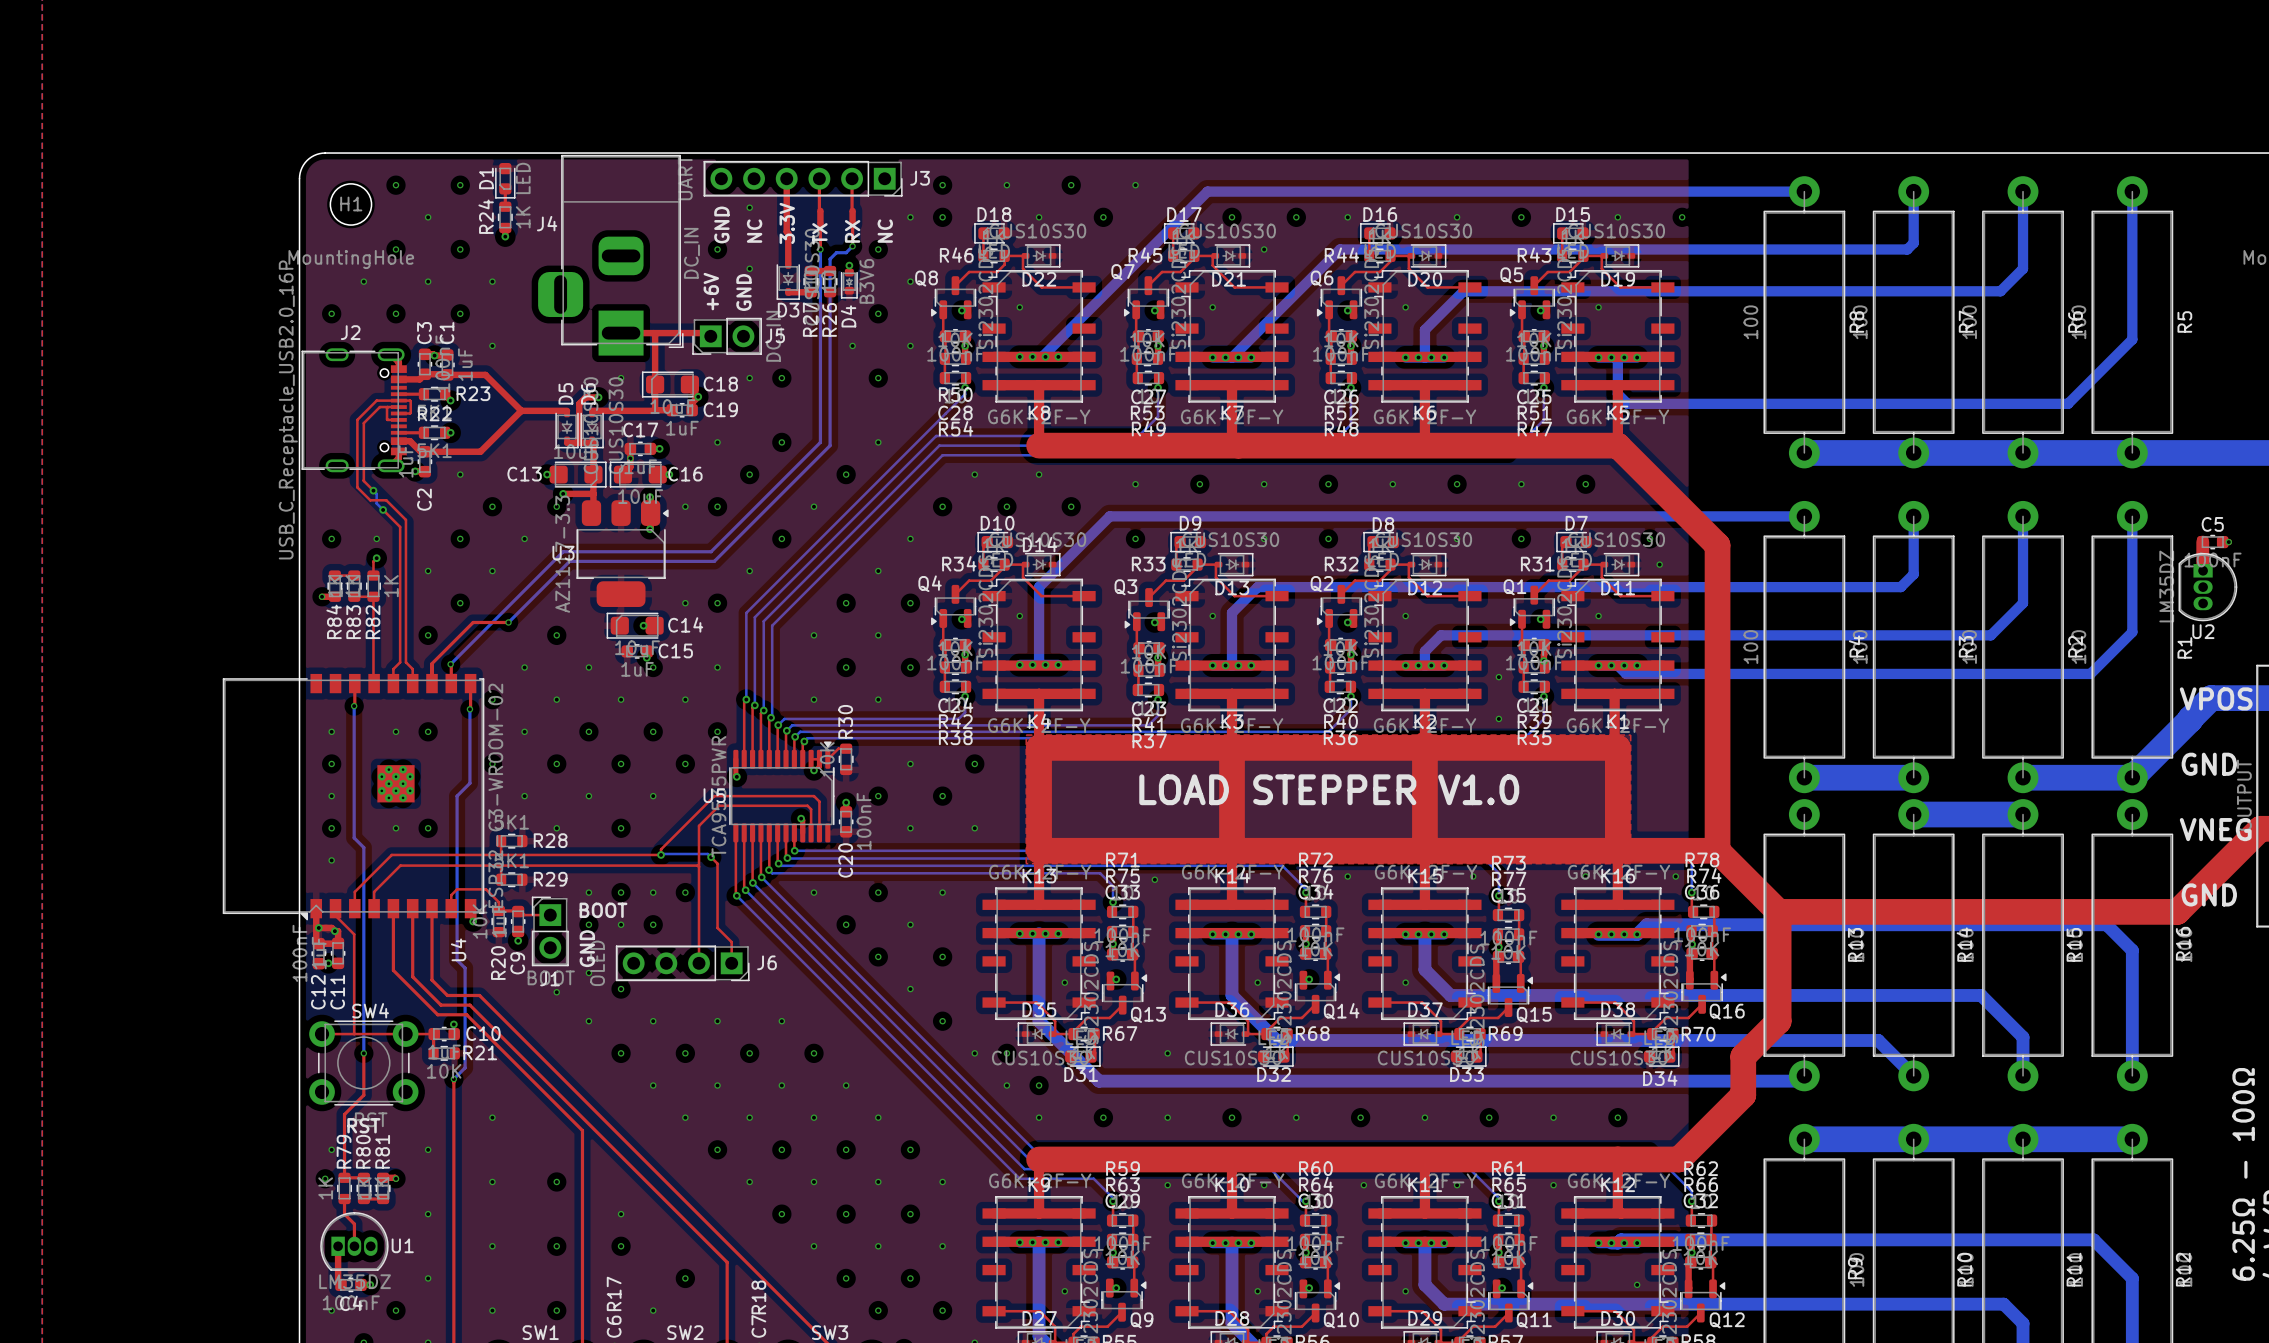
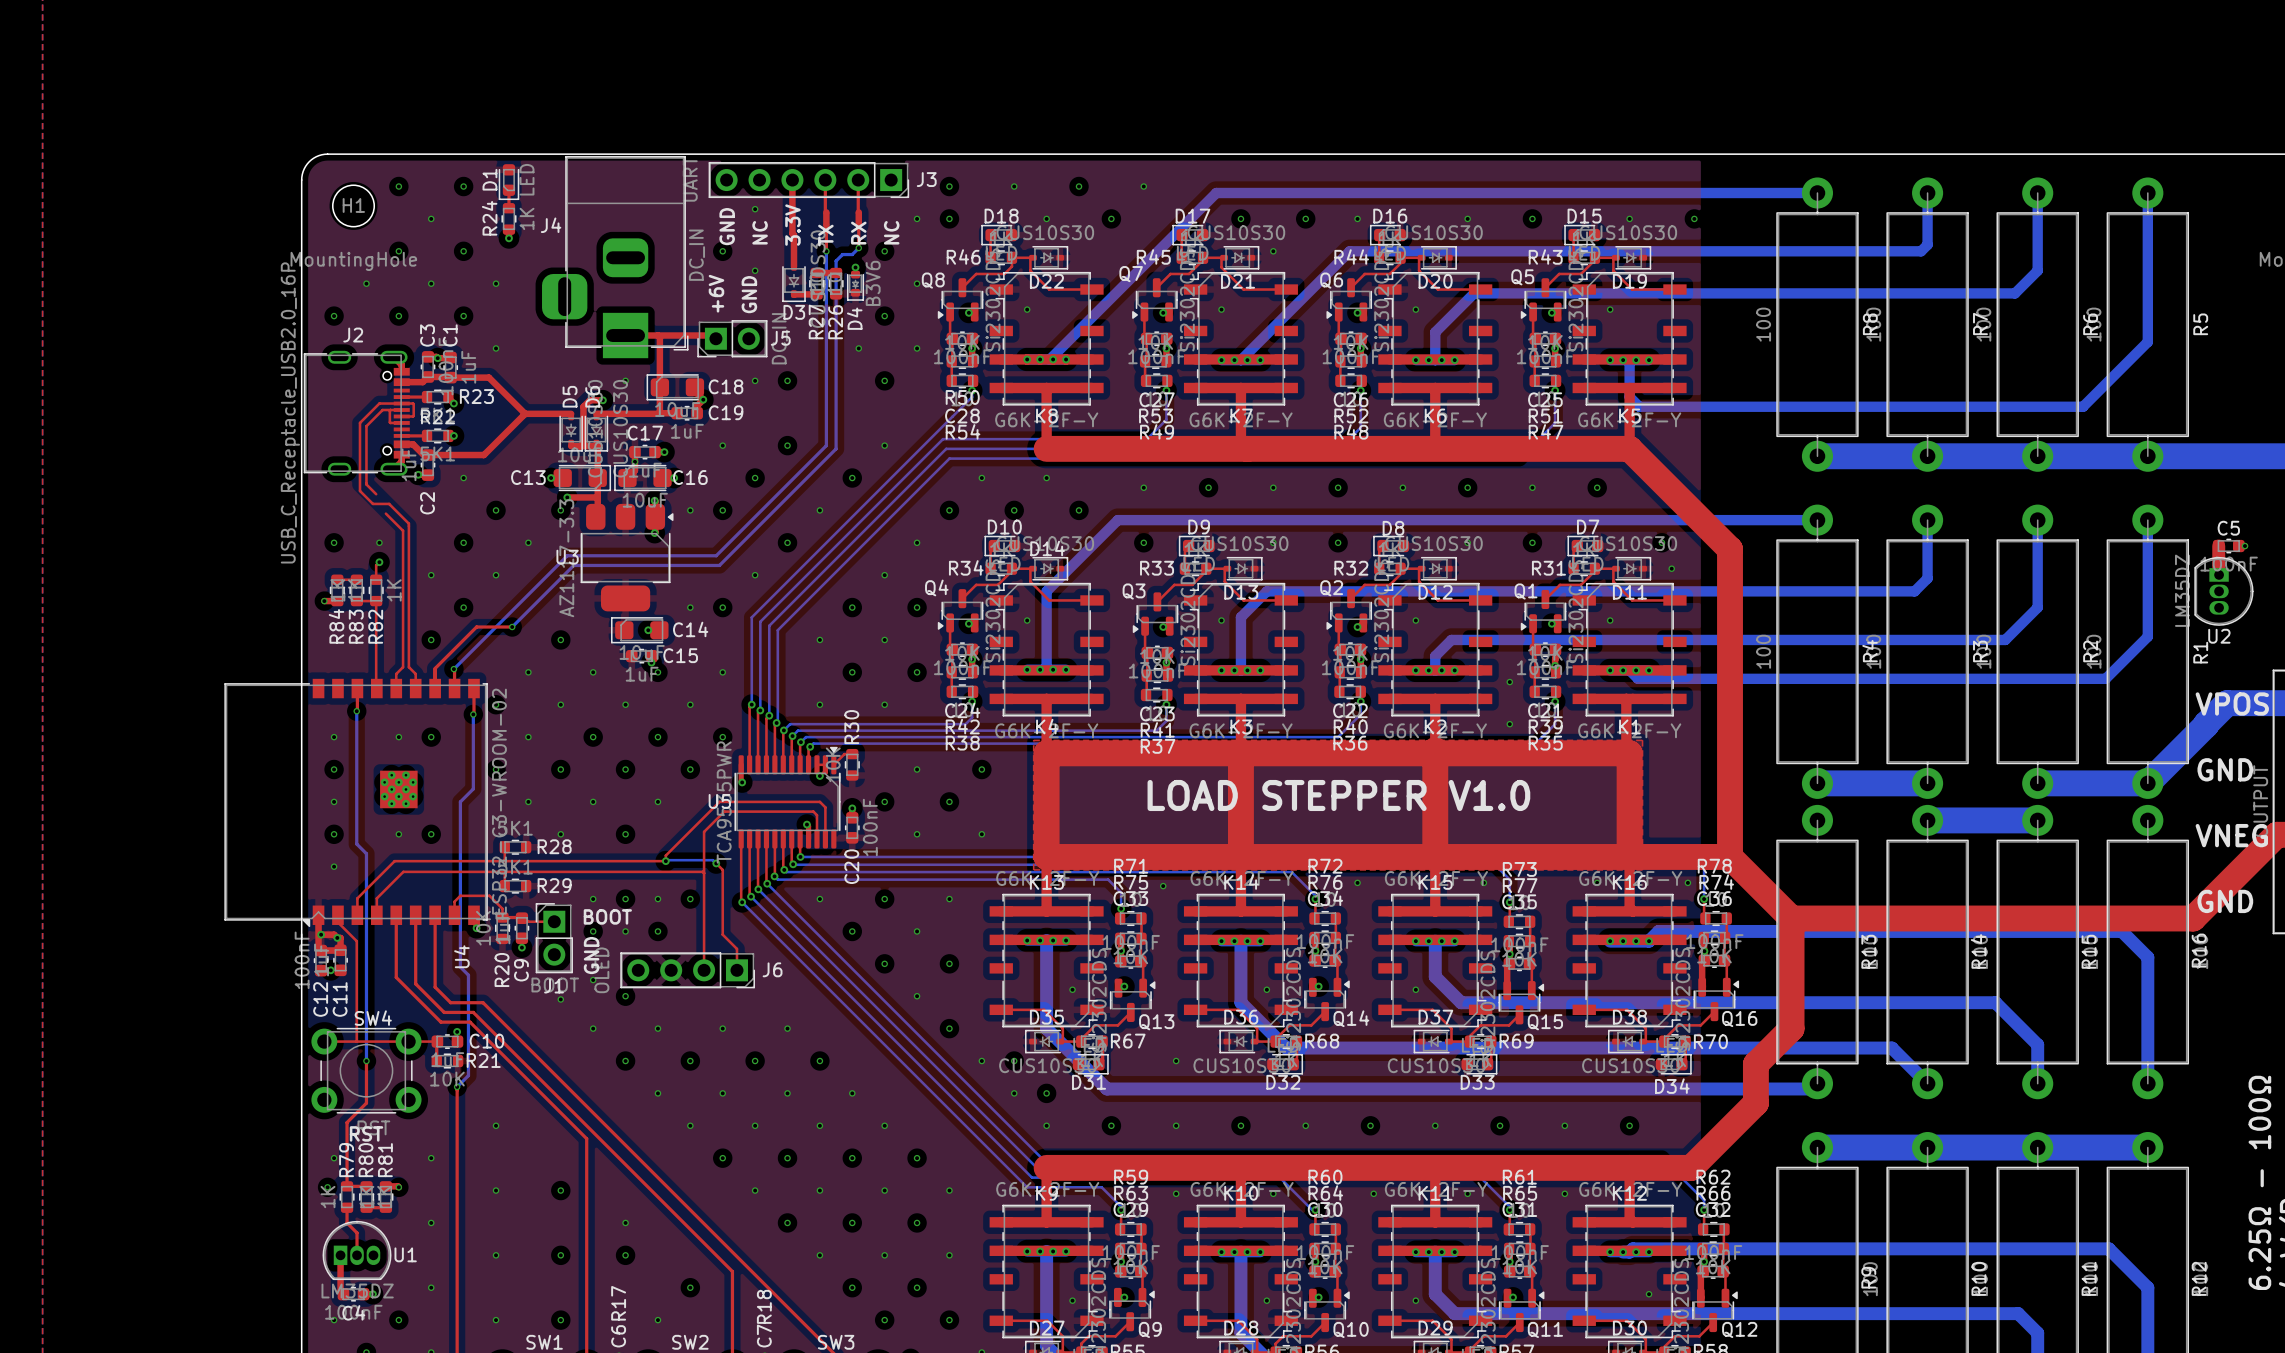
bottom track: (373, 490) (376, 493) (376, 503) (383, 509) -> none
via: (373, 490) -> none
via: (383, 509) -> none

